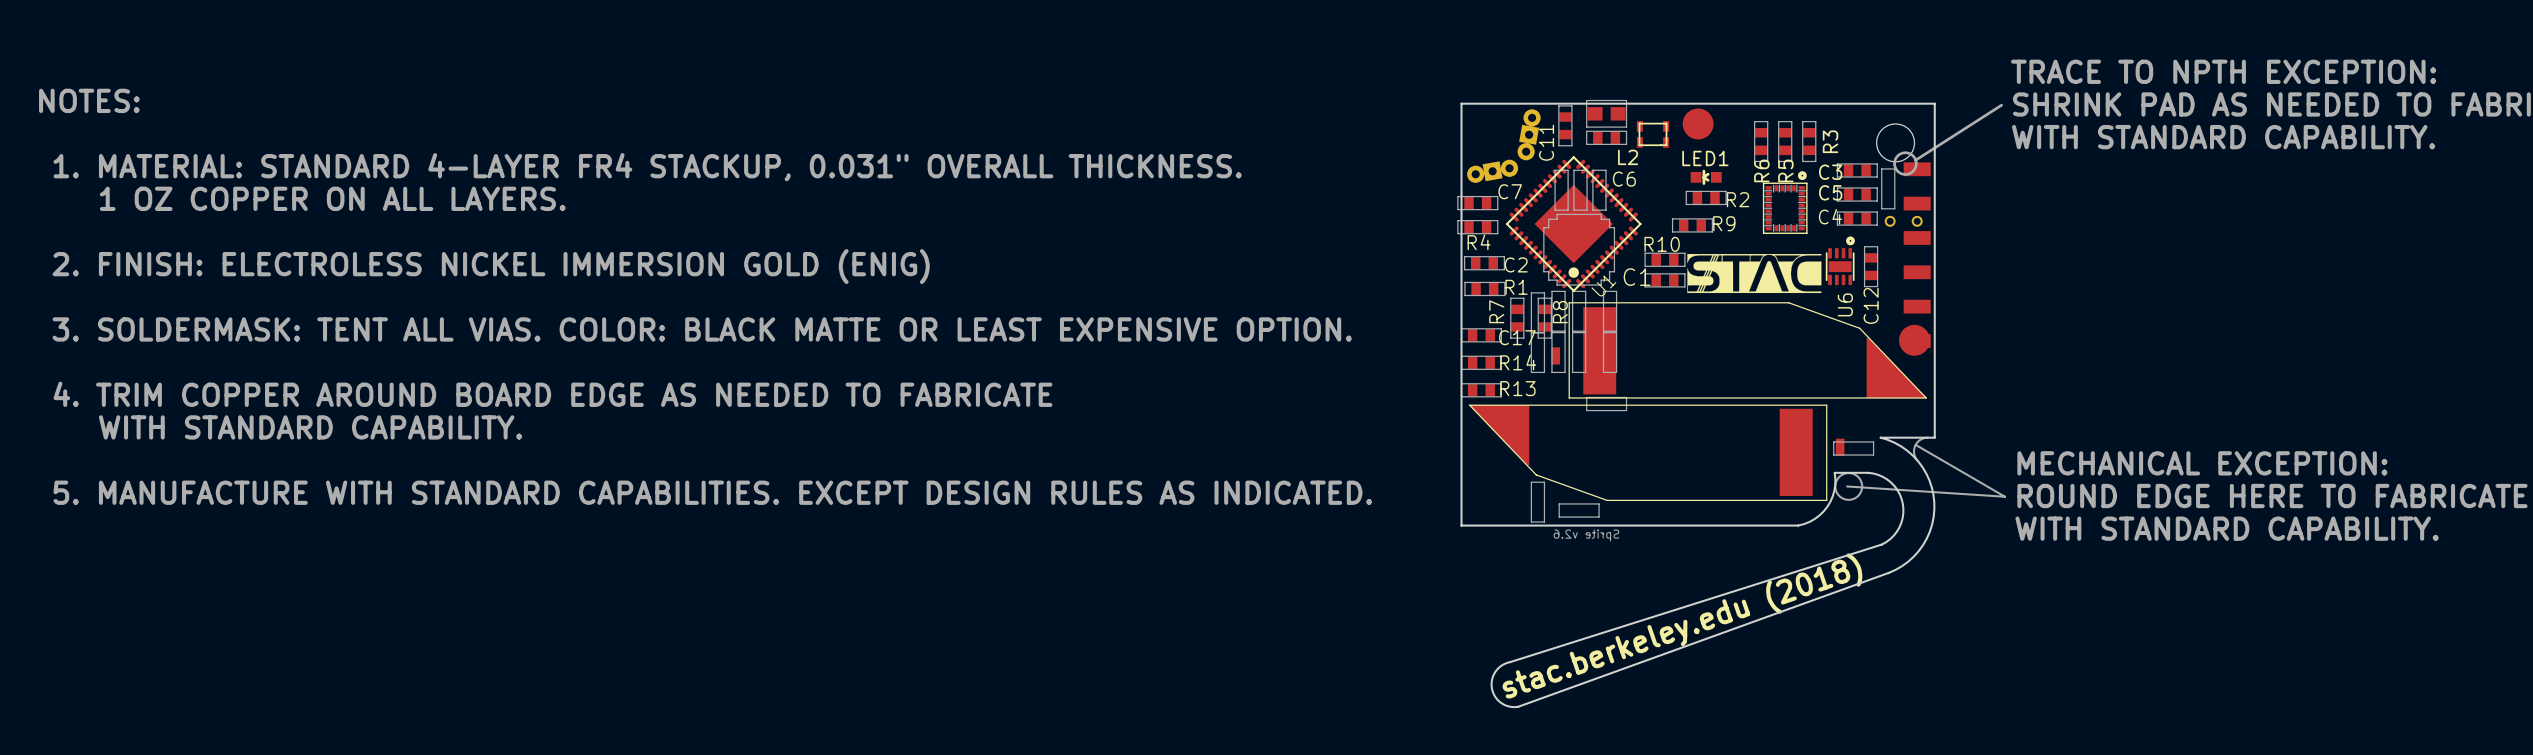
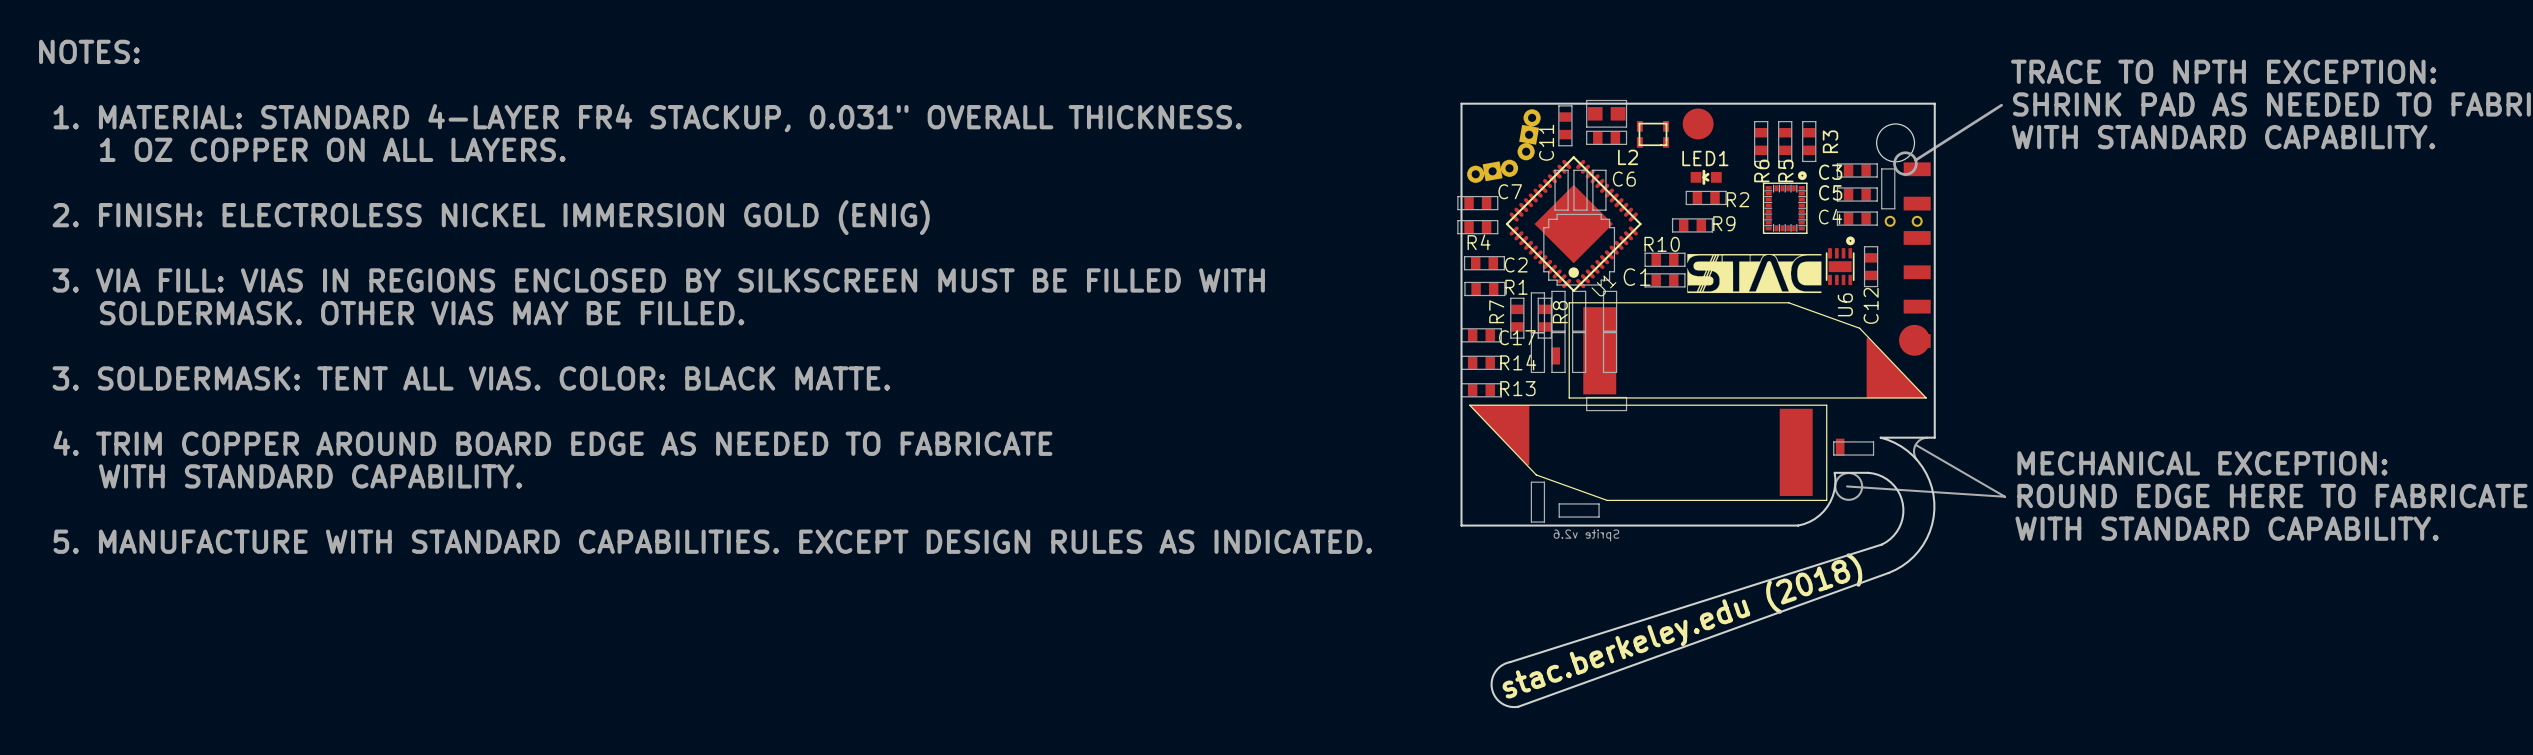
text position: NOTES: (89, 100) -> NOTES: (89, 51)
text position: 1. MATERIAL: STANDARD 4-LAYER FR4 STACKUP, 0.031" OVERALL THICKNESS. (647, 167) -> 1. MATERIAL: STANDARD 4-LAYER FR4 STACKUP, 0.031" OVERALL THICKNESS. (647, 118)
text position: 1 OZ COPPER ON ALL LAYERS. (332, 198) -> 1 OZ COPPER ON ALL LAYERS. (332, 149)
text position: 2. FINISH: ELECTROLESS NICKEL IMMERSION GOLD (ENIG) (491, 266) -> 2. FINISH: ELECTROLESS NICKEL IMMERSION GOLD (ENIG) (491, 217)
text: none -> 3. VIA FILL: VIAS IN REGIONS ENCLOSED BY SILKSCREEN MUST BE FILLED WITH (658, 280)
text: none -> SOLDERMASK. OTHER VIAS MAY BE FILLED. (422, 313)
text: 3. SOLDERMASK: TENT ALL VIAS. COLOR: BLACK MATTE OR LEAST EXPENSIVE OPTION. (702, 329) -> none
text: none -> 3. SOLDERMASK: TENT ALL VIAS. COLOR: BLACK MATTE. (471, 378)
text position: 4. TRIM COPPER AROUND BOARD EDGE AS NEEDED TO FABRICATE (552, 394) -> 4. TRIM COPPER AROUND BOARD EDGE AS NEEDED TO FABRICATE (552, 443)
text position: WITH STANDARD CAPABILITY. (310, 427) -> WITH STANDARD CAPABILITY. (310, 476)
text position: 5. MANUFACTURE WITH STANDARD CAPABILITIES. EXCEPT DESIGN RULES AS INDICATED. (712, 492) -> 5. MANUFACTURE WITH STANDARD CAPABILITIES. EXCEPT DESIGN RULES AS INDICATED. (712, 541)

